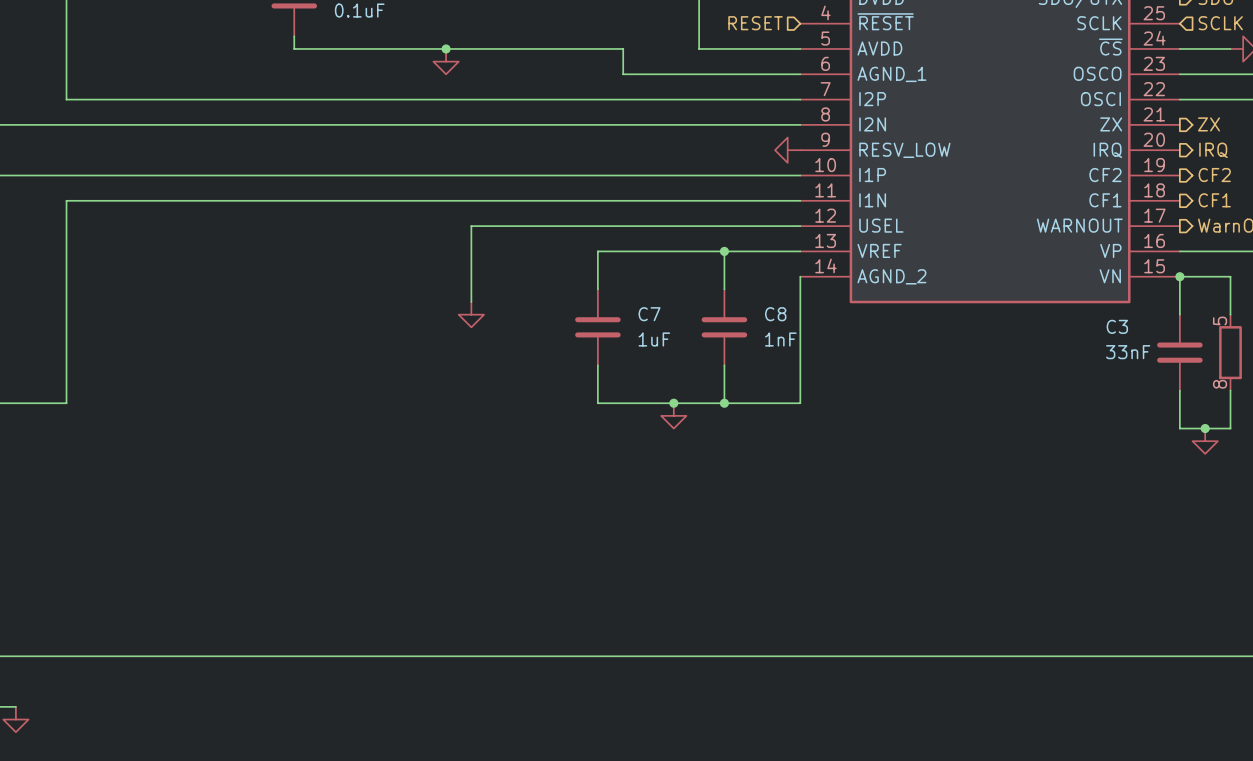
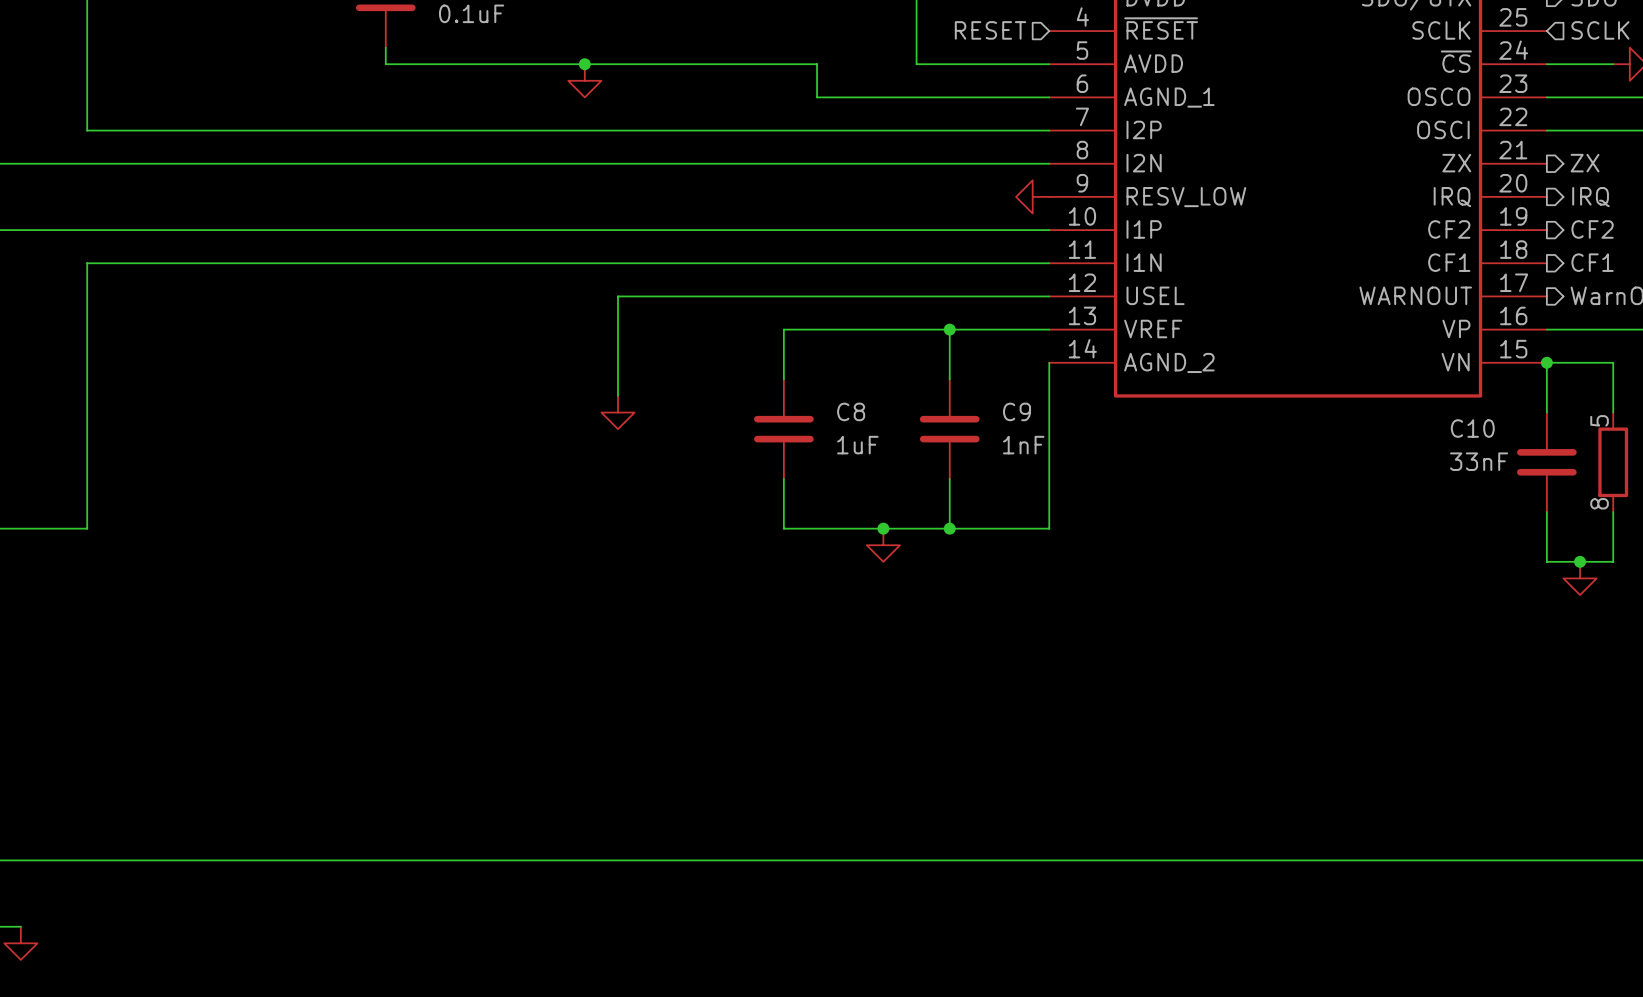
C7 name: C7 (649, 314) -> C8 (851, 411)
C8 name: C8 (775, 314) -> C9 (1017, 411)
C3 name: C3 (1117, 326) -> C10 (1472, 428)

